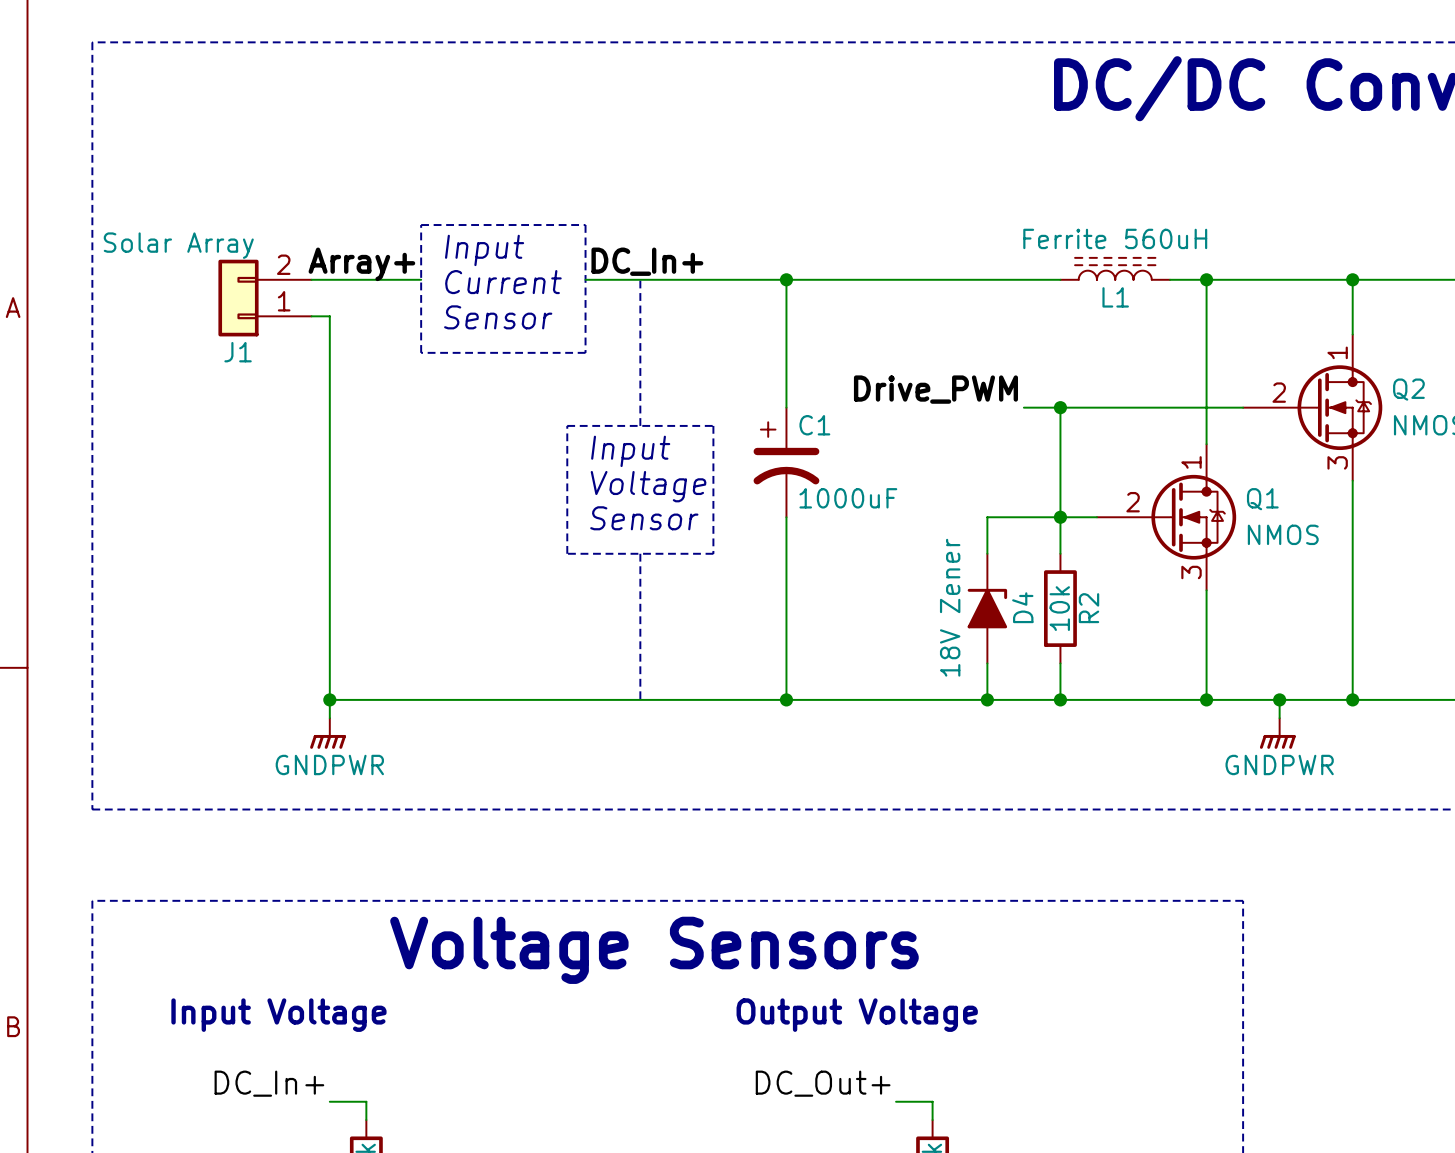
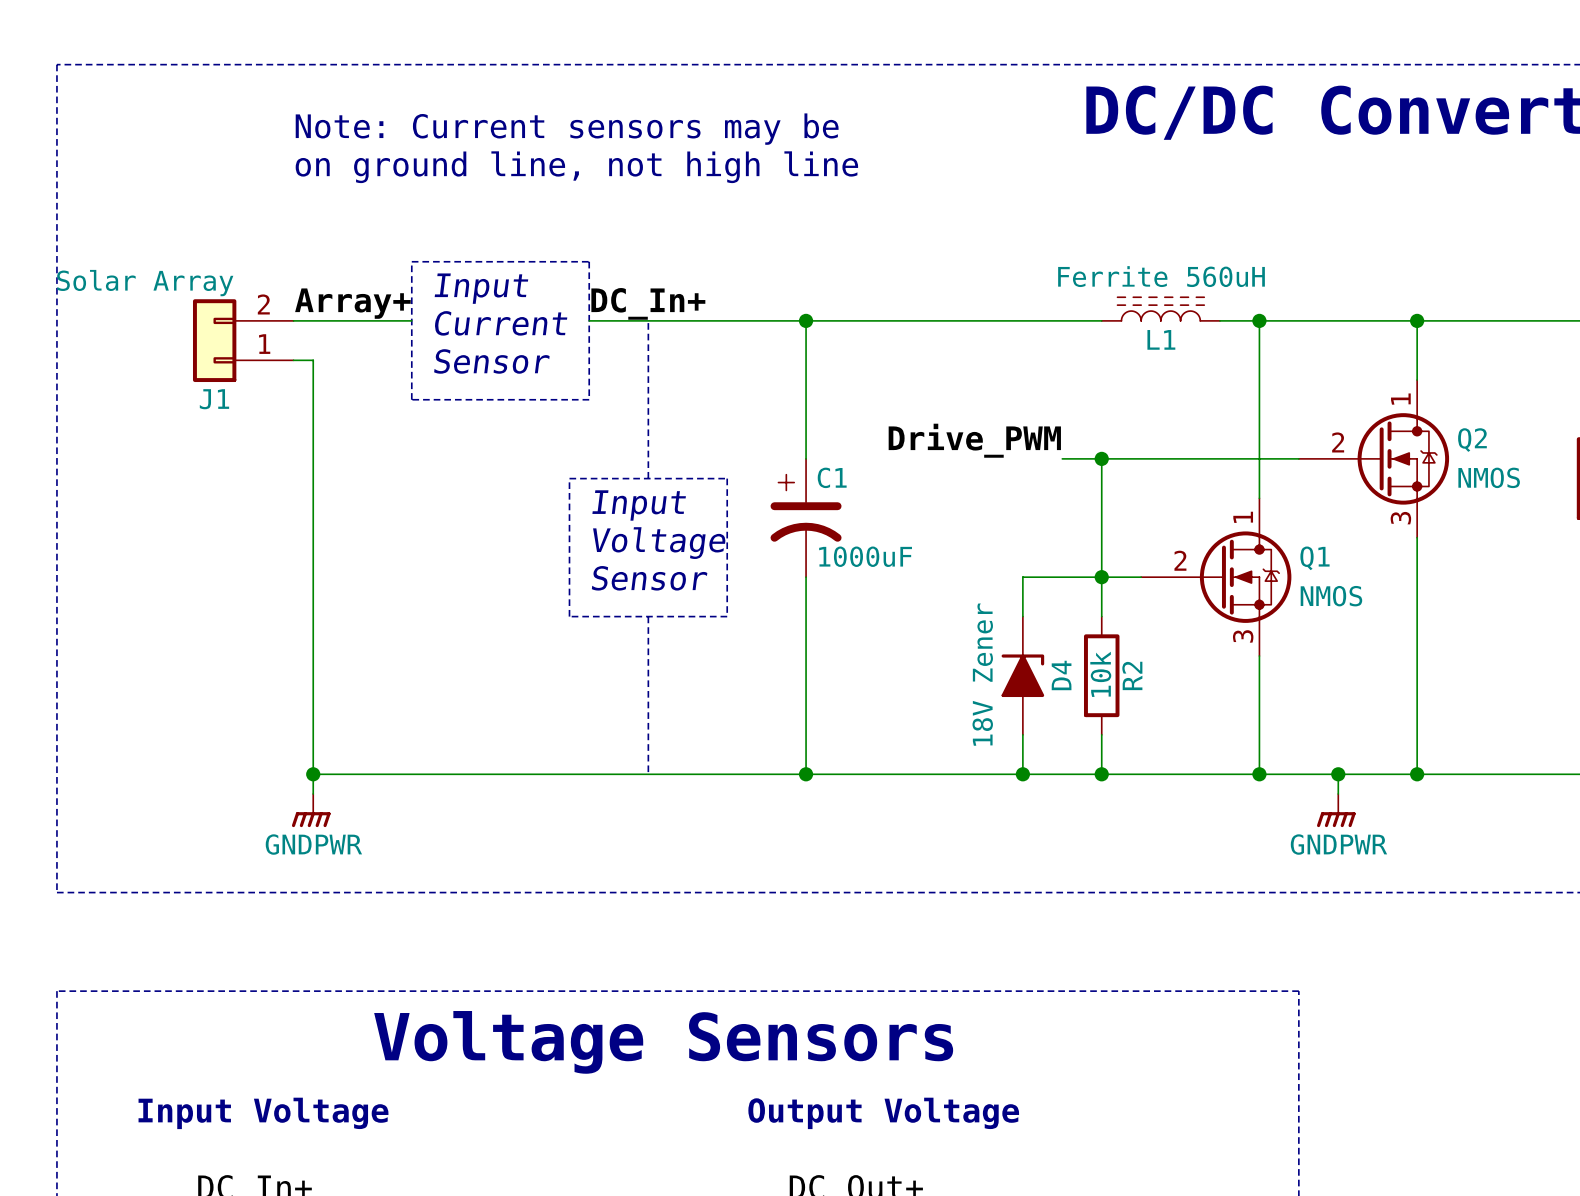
text: none -> Note: Current sensors may be (567, 129)
text: none -> on ground line, not high line (576, 167)

